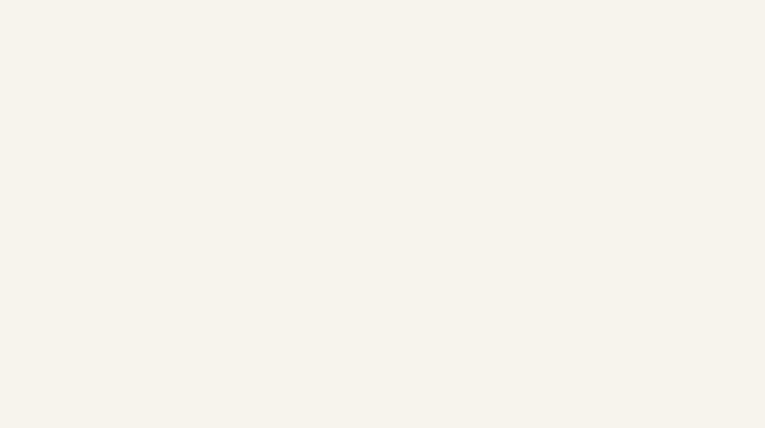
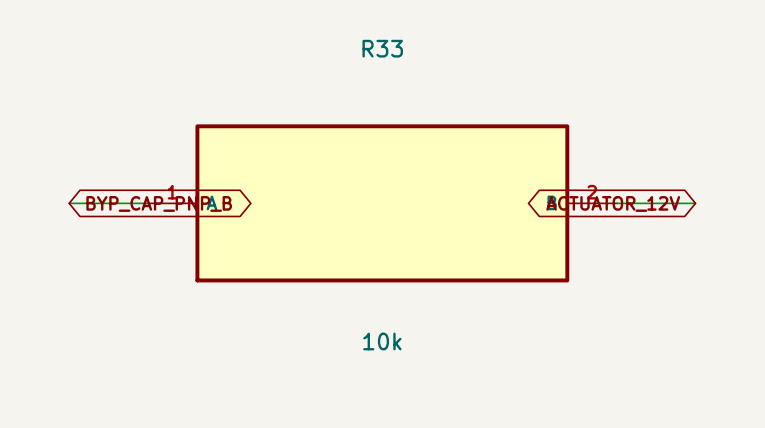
wire: none -> (69, 203) (147, 203)
global label: none -> BYP_CAP_PNP_B (159, 203)
R33: none -> 10k (382, 203)
global label: none -> ACTUATOR_12V (613, 203)
wire: none -> (617, 203) (695, 203)

